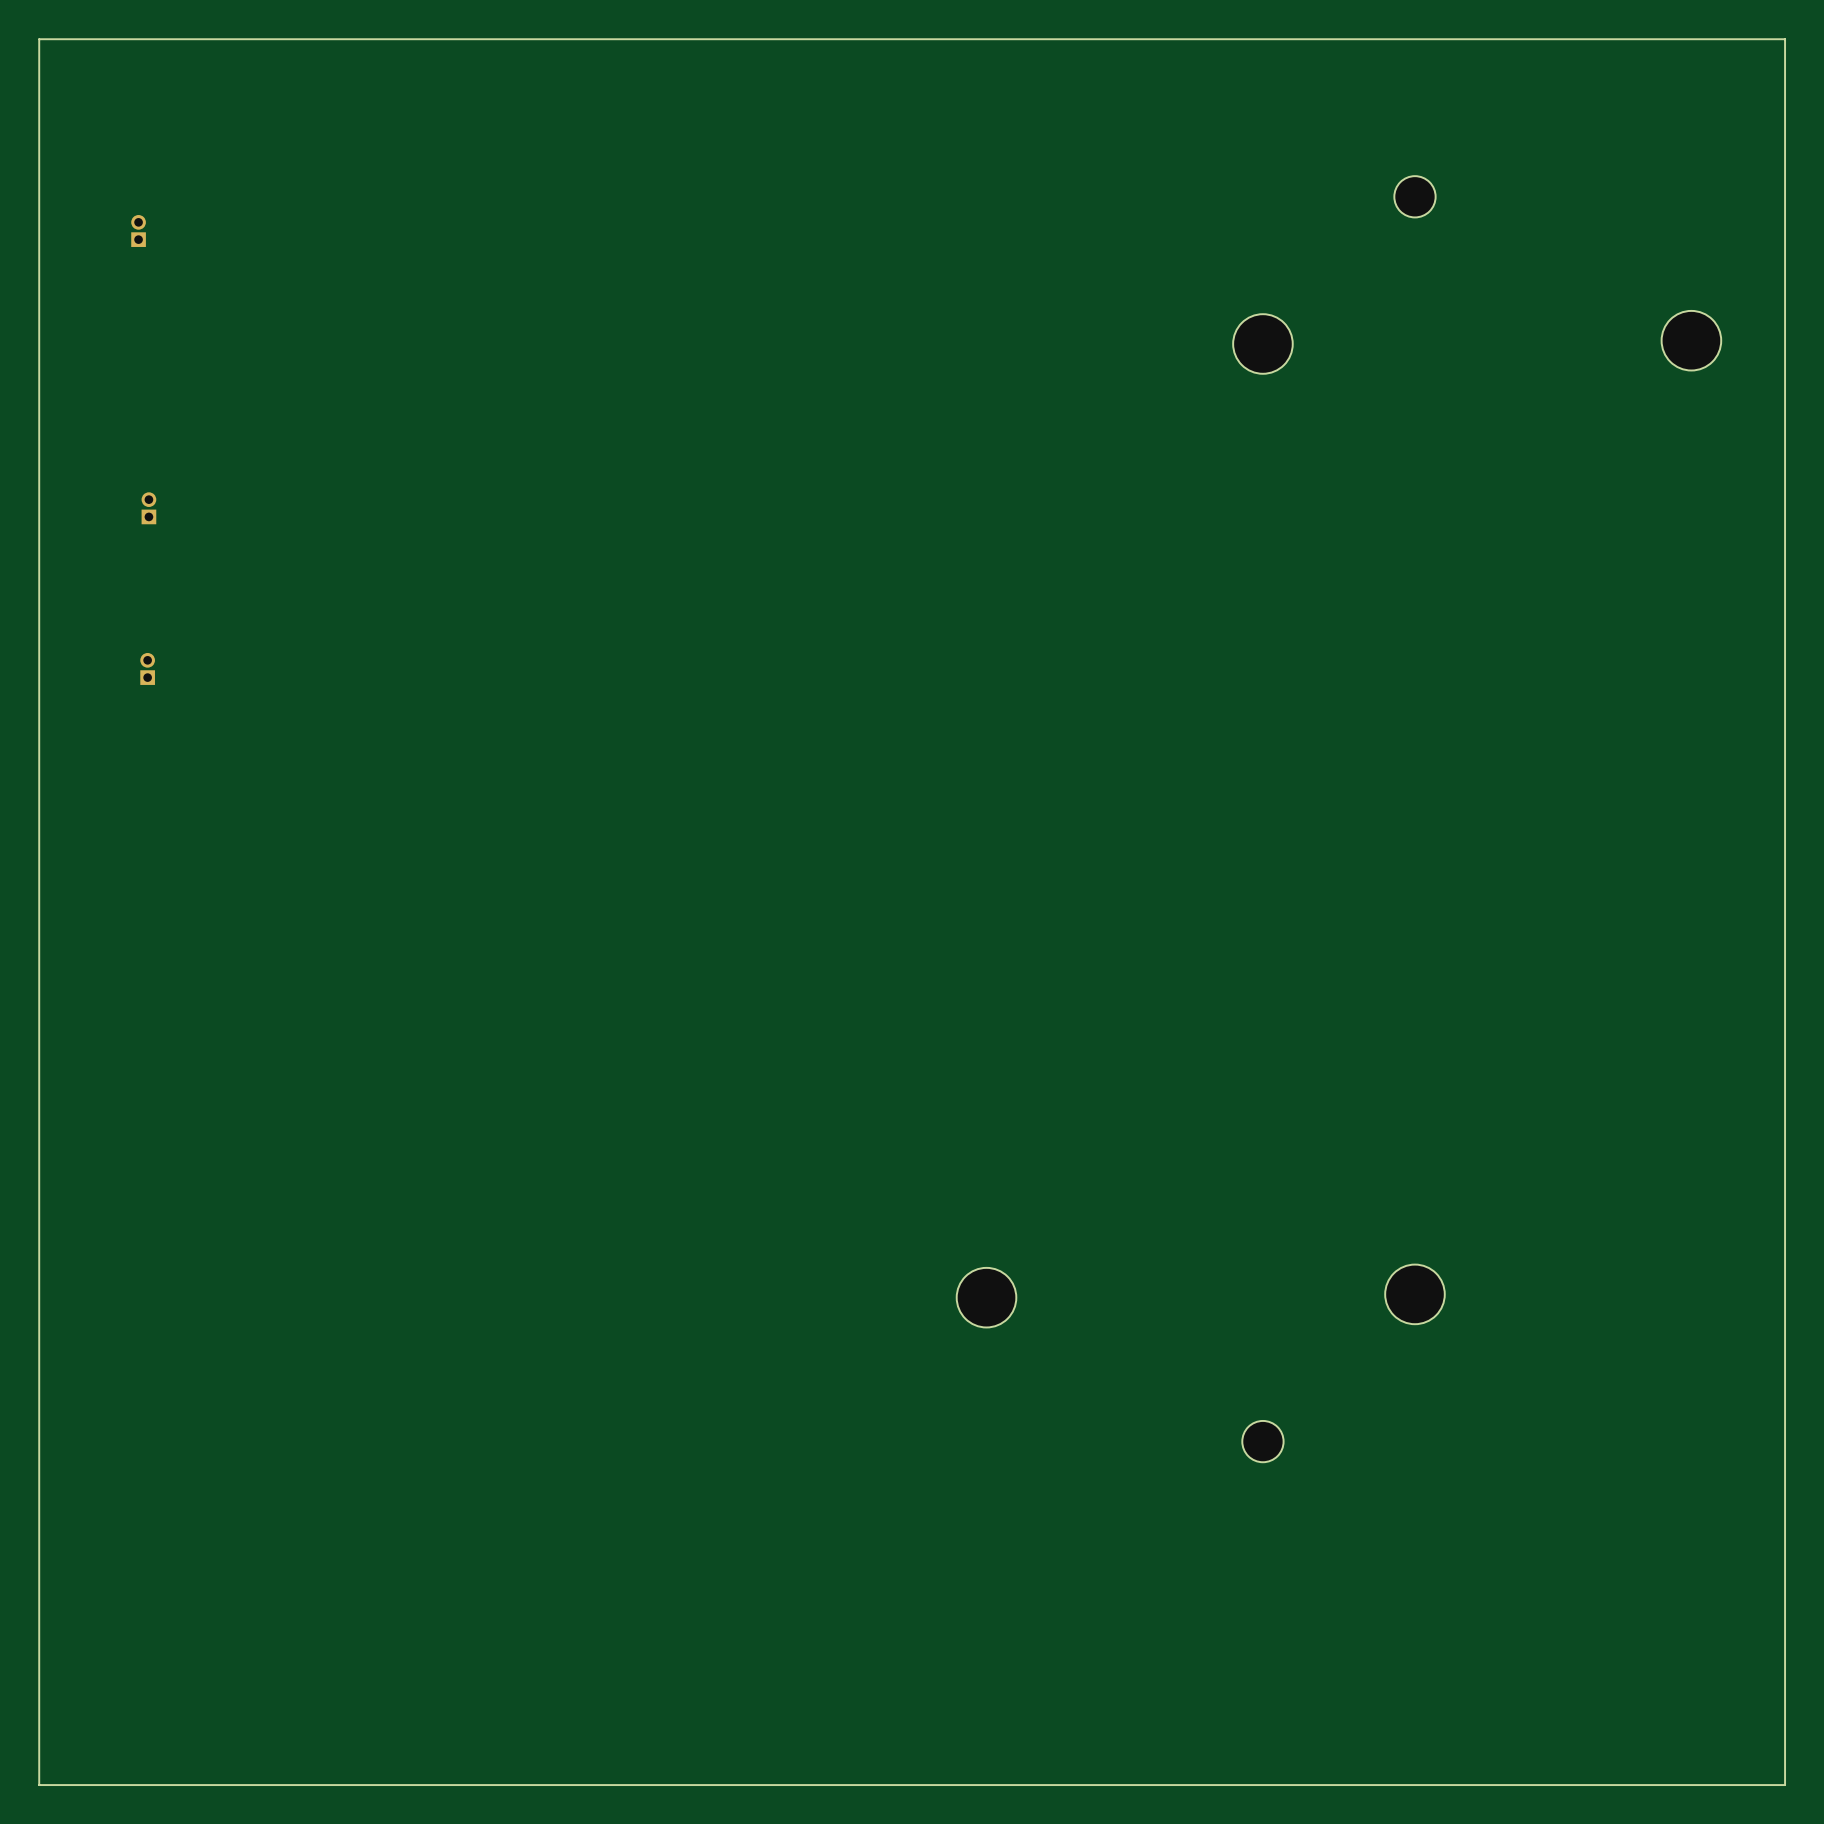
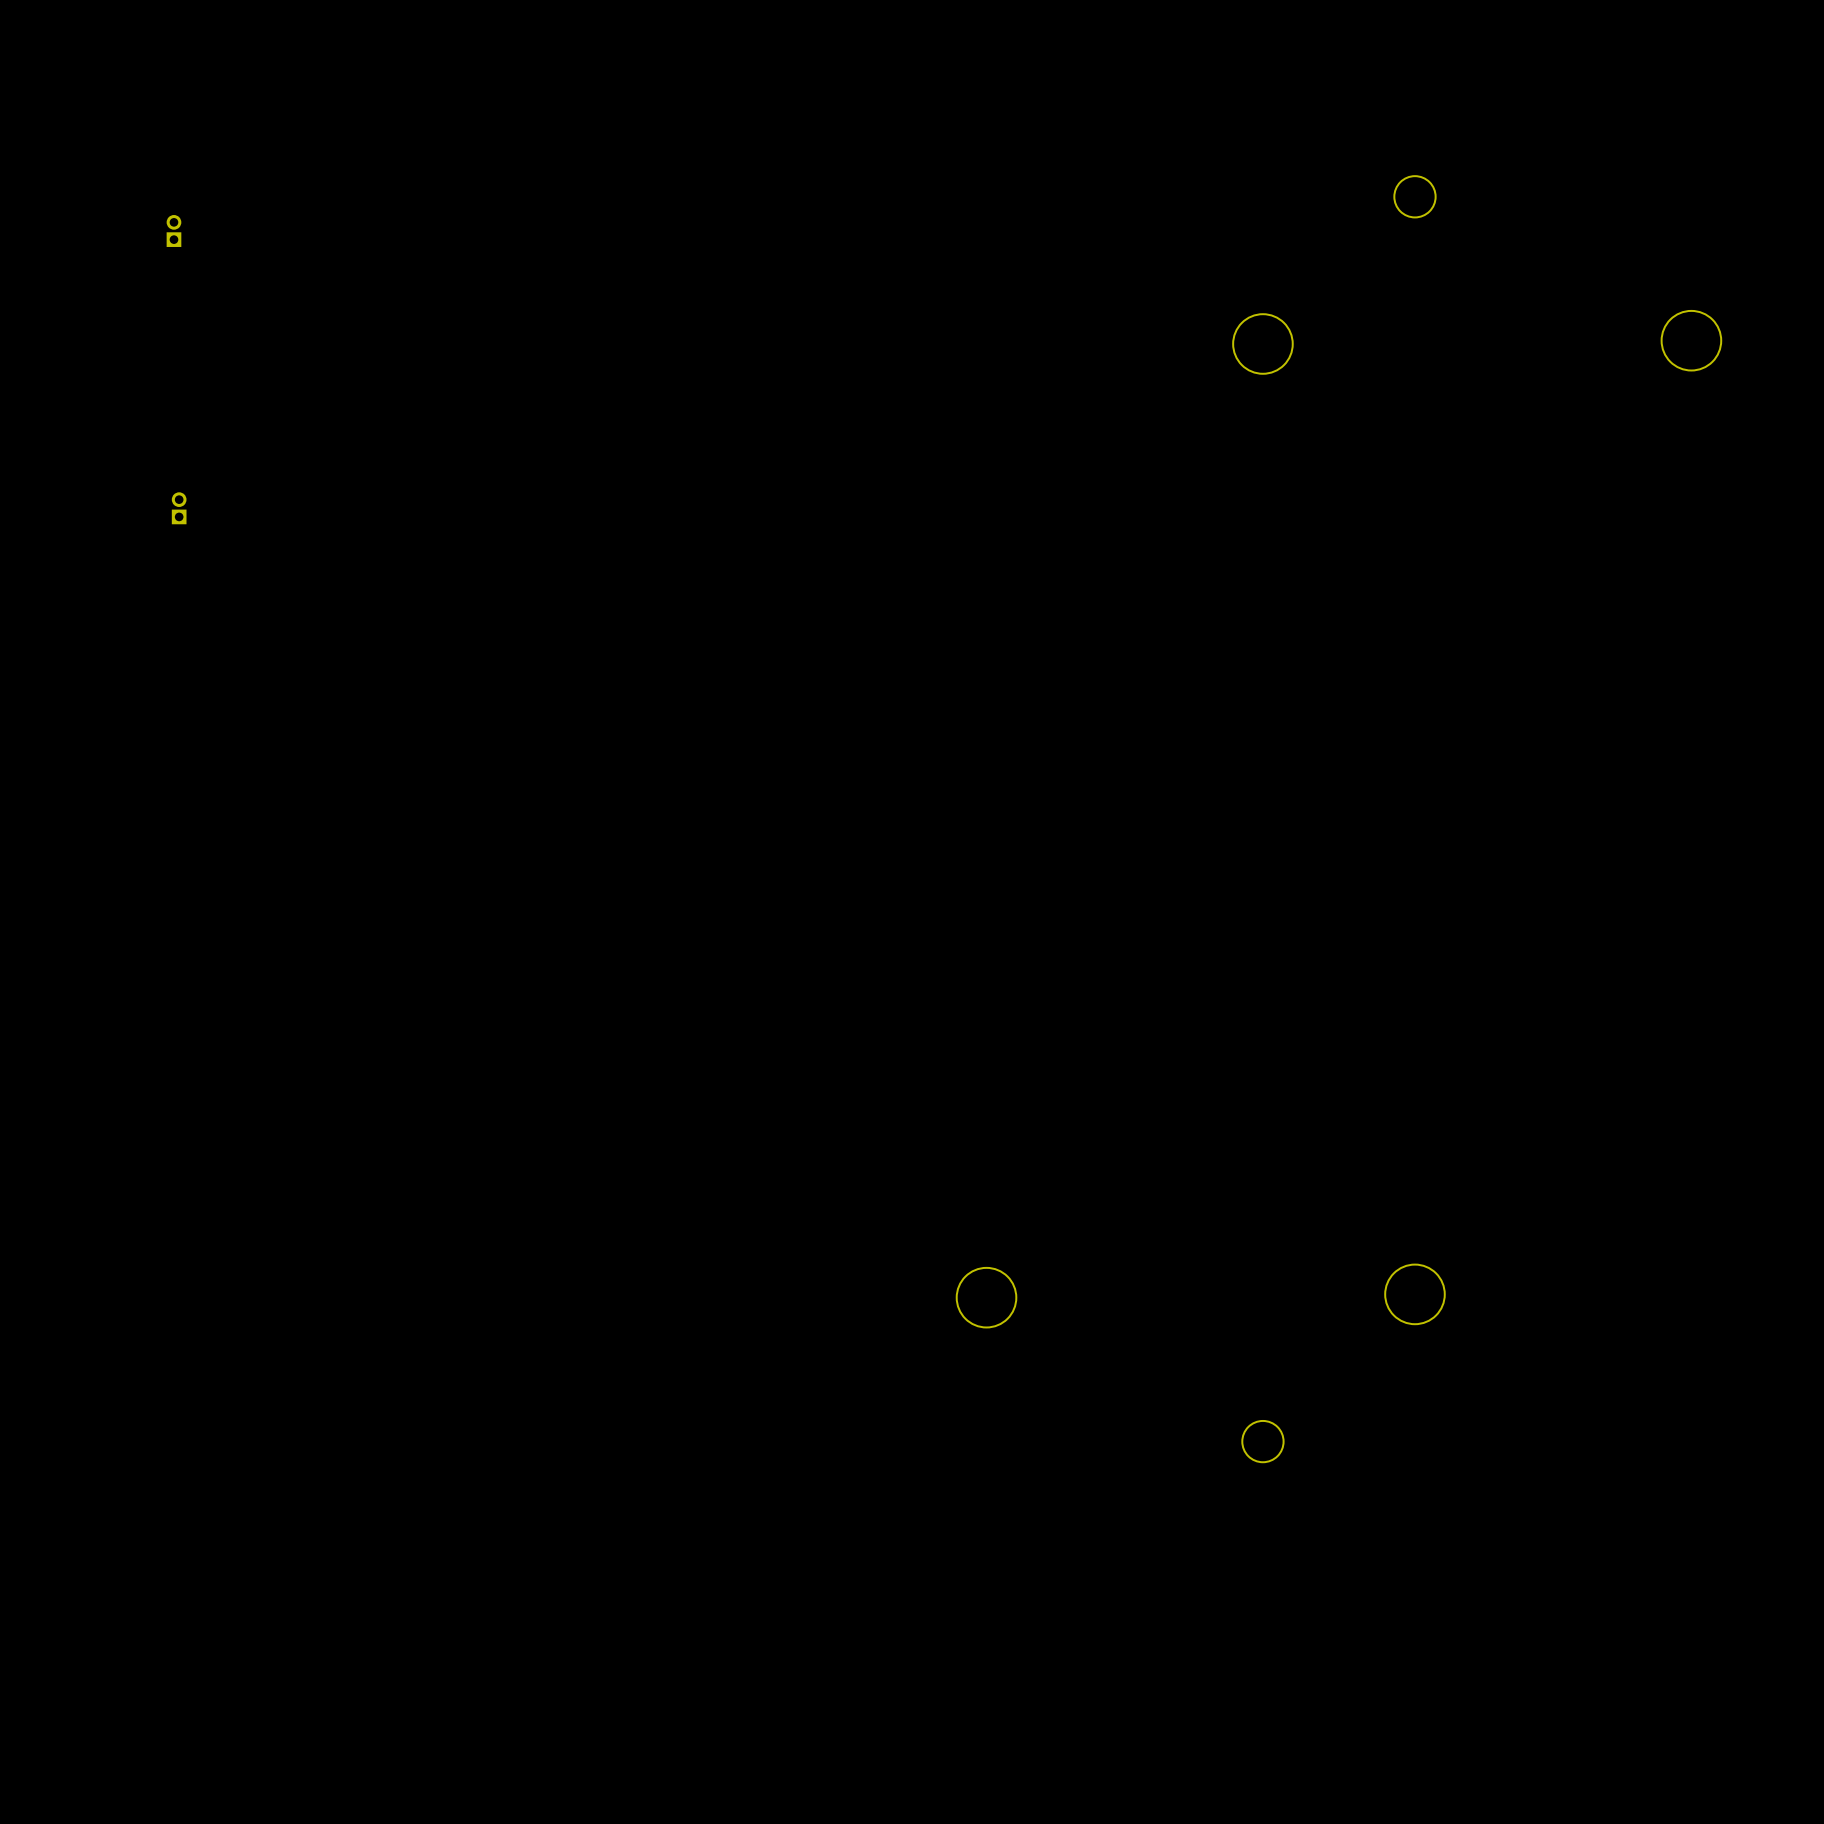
board edge: (1785, 39) (39, 39) (39, 1785) (1785, 1785) (1785, 39) -> none
part position: (138, 230) -> (173, 230)
part position: (148, 508) -> (179, 508)
part: (147, 668) -> none

